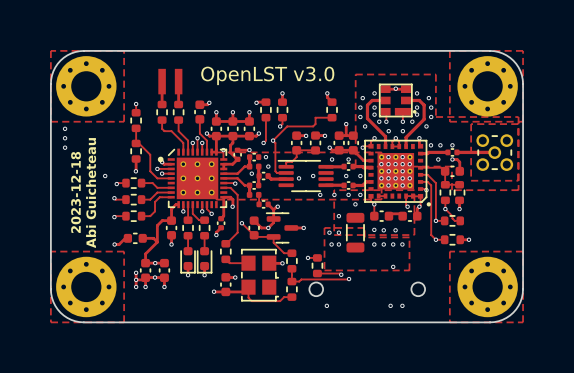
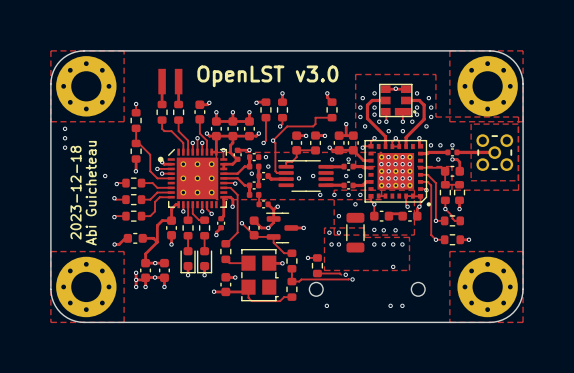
via: (341, 274) -> none
via: none -> (345, 274)
via: (349, 279) -> none
via: none -> (352, 279)

